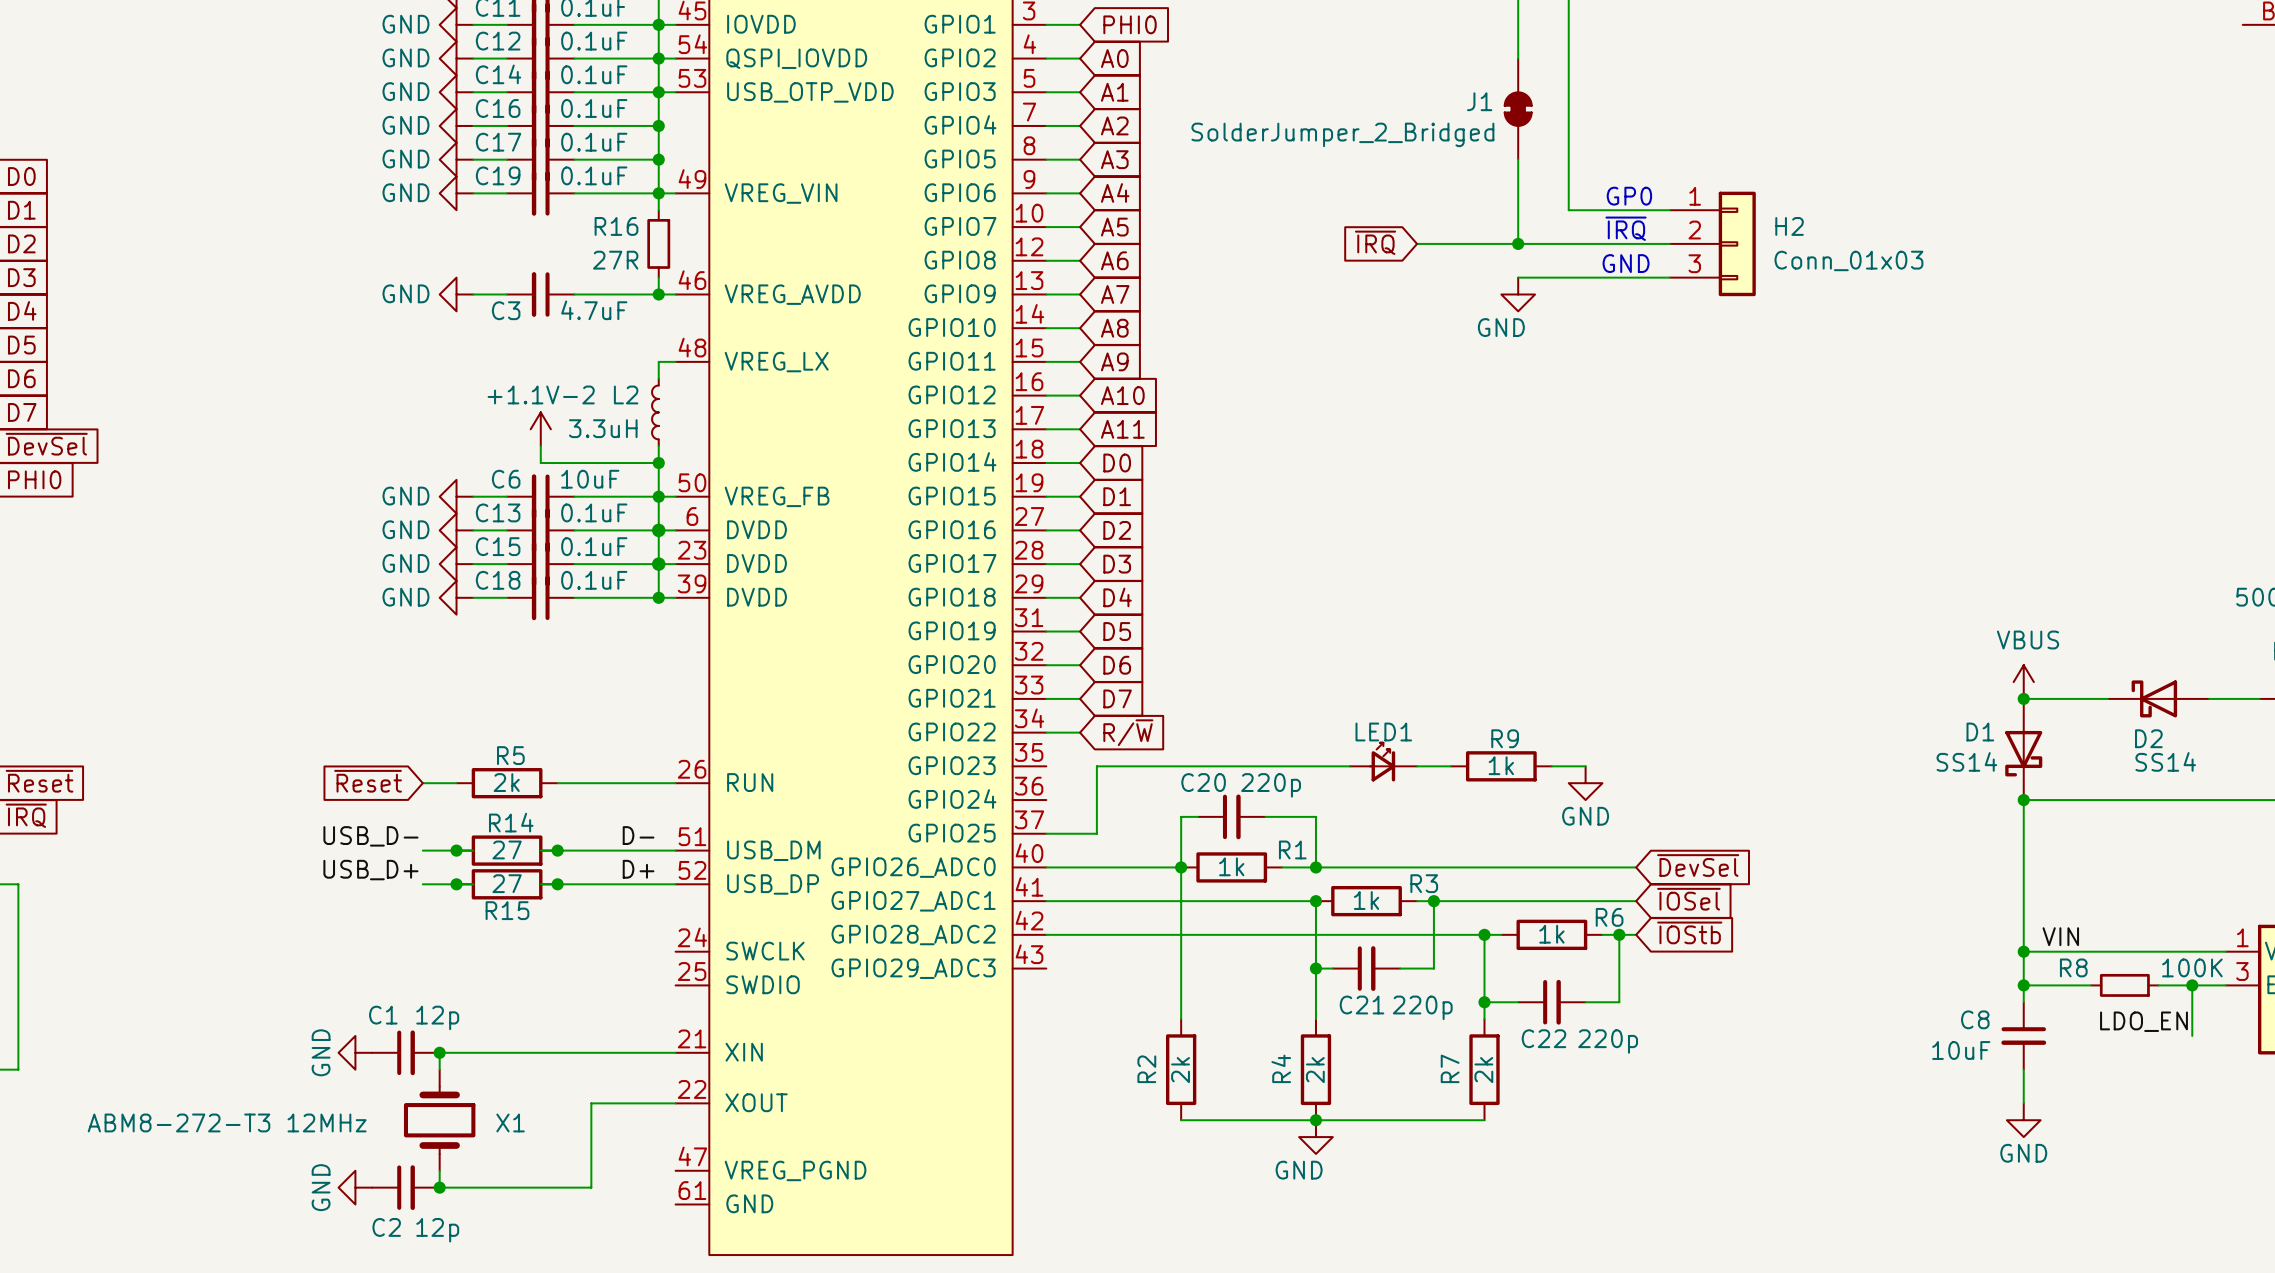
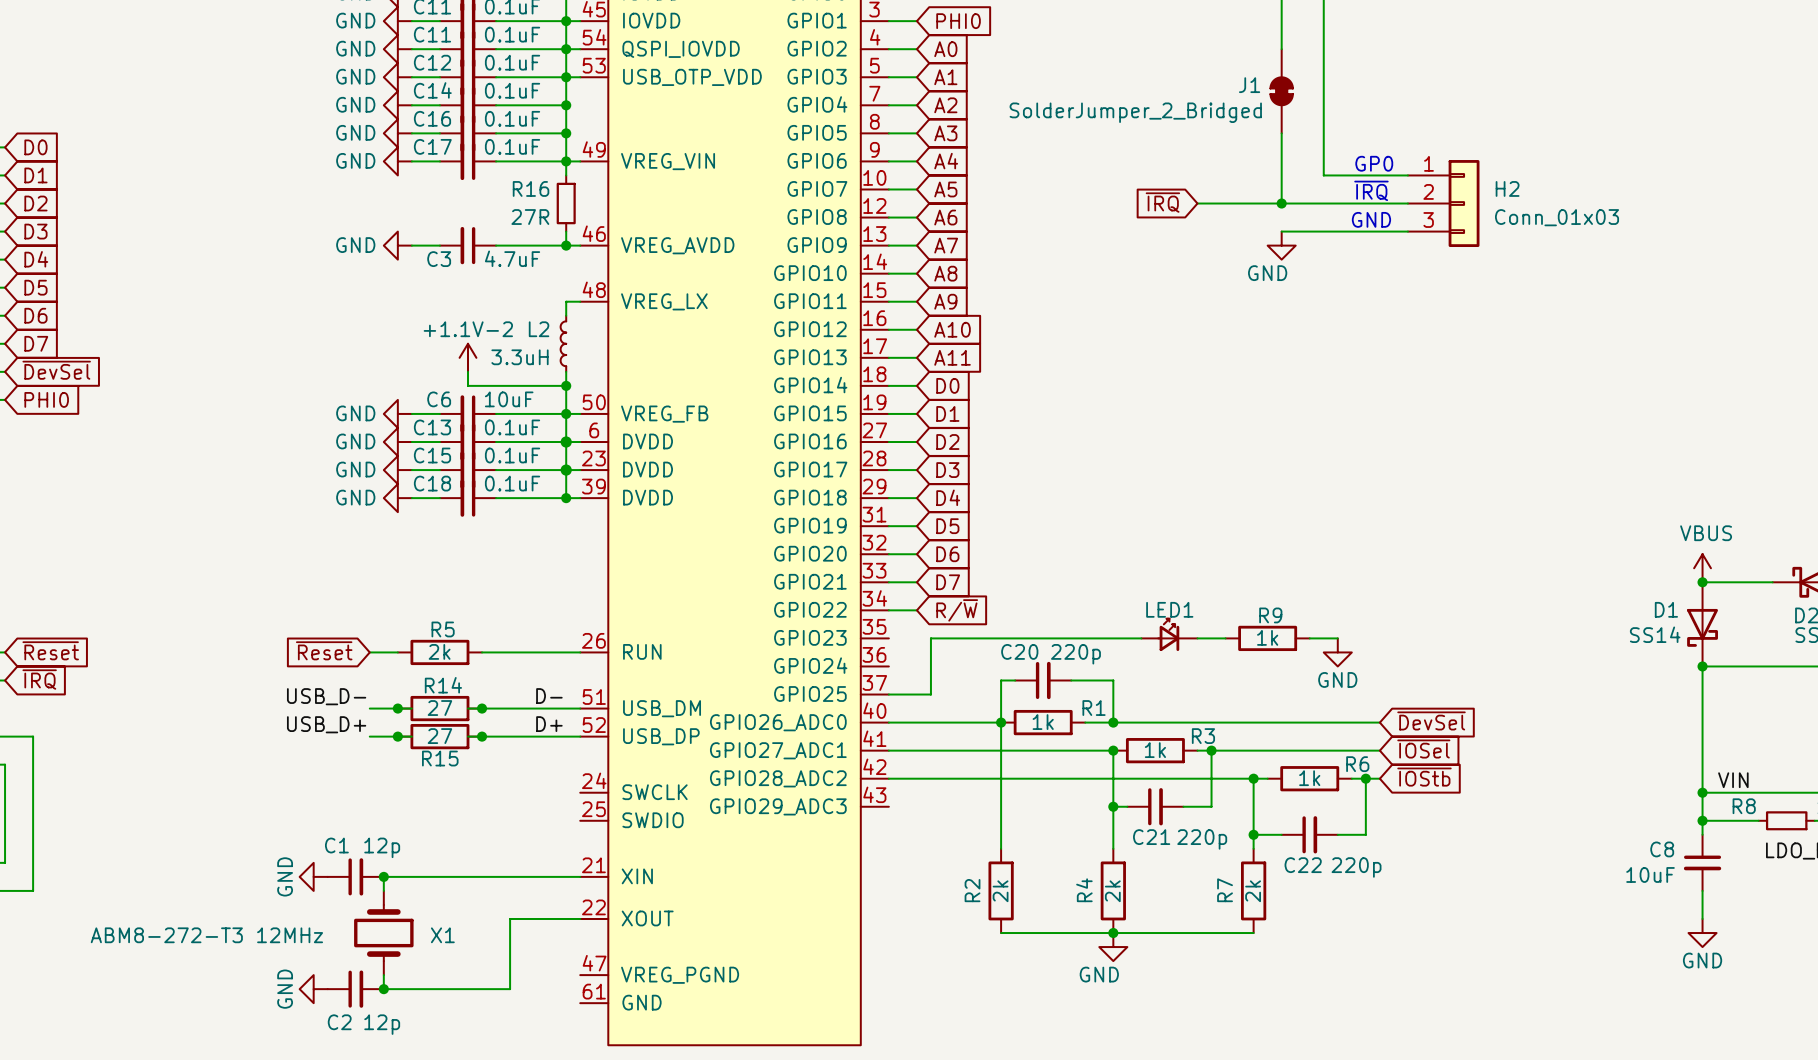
C12 name: C12 (498, 41) -> C11 (432, 34)
C14 name: C14 (498, 74) -> C12 (432, 62)
C16 name: C16 (498, 108) -> C14 (432, 90)
C17 name: C17 (498, 142) -> C16 (432, 118)
C19 name: C19 (498, 175) -> C17 (432, 146)

